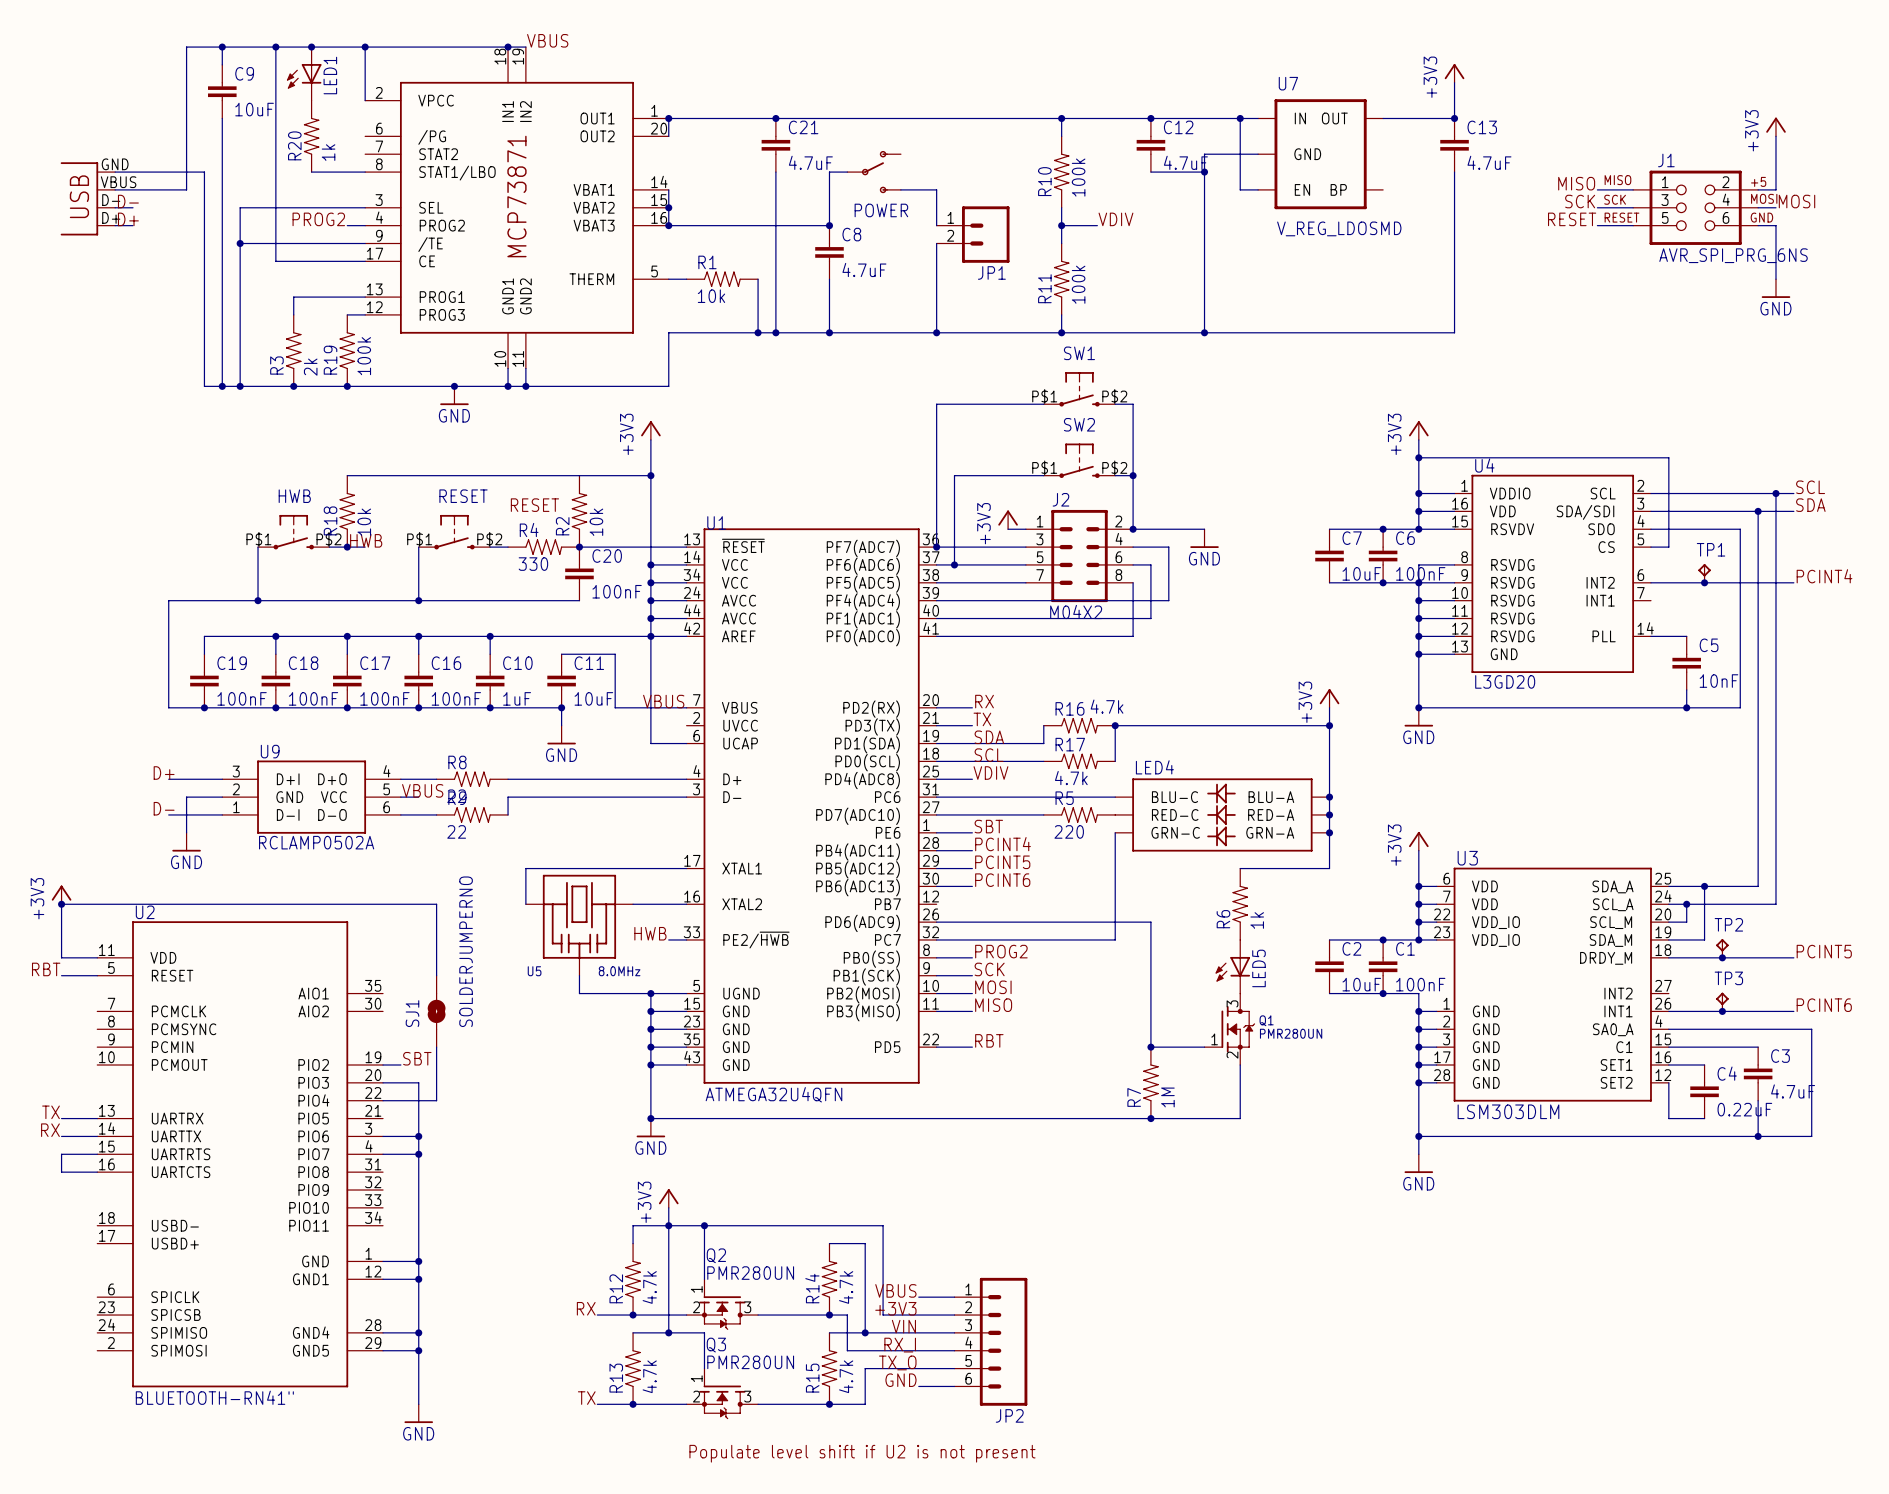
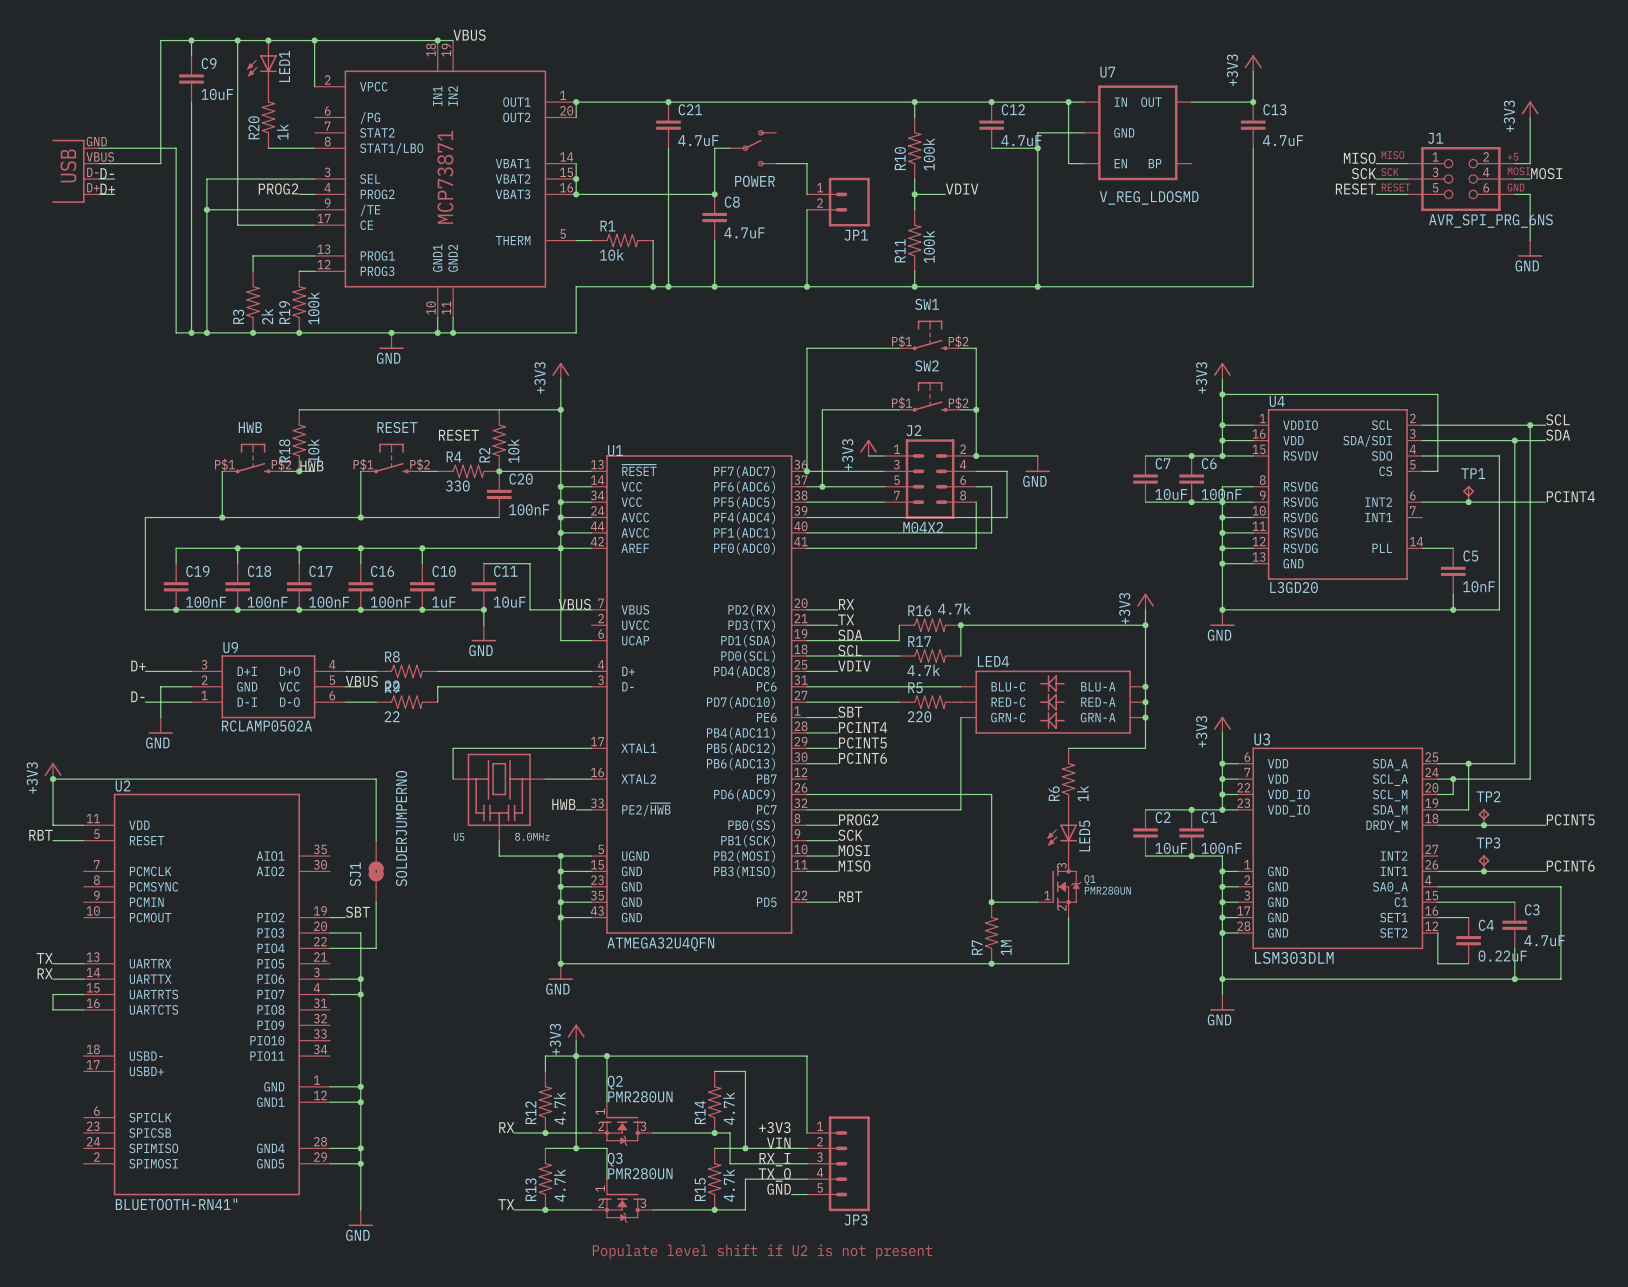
wire: (883, 1225) (883, 1315) (954, 1315) -> (760, 1056) (806, 1056) (806, 1132)
label: VBUS (895, 1290) -> none
wire: (918, 1297) (954, 1297) -> none
JP2: (990, 1341) -> none
JP3: none -> (838, 1163)

